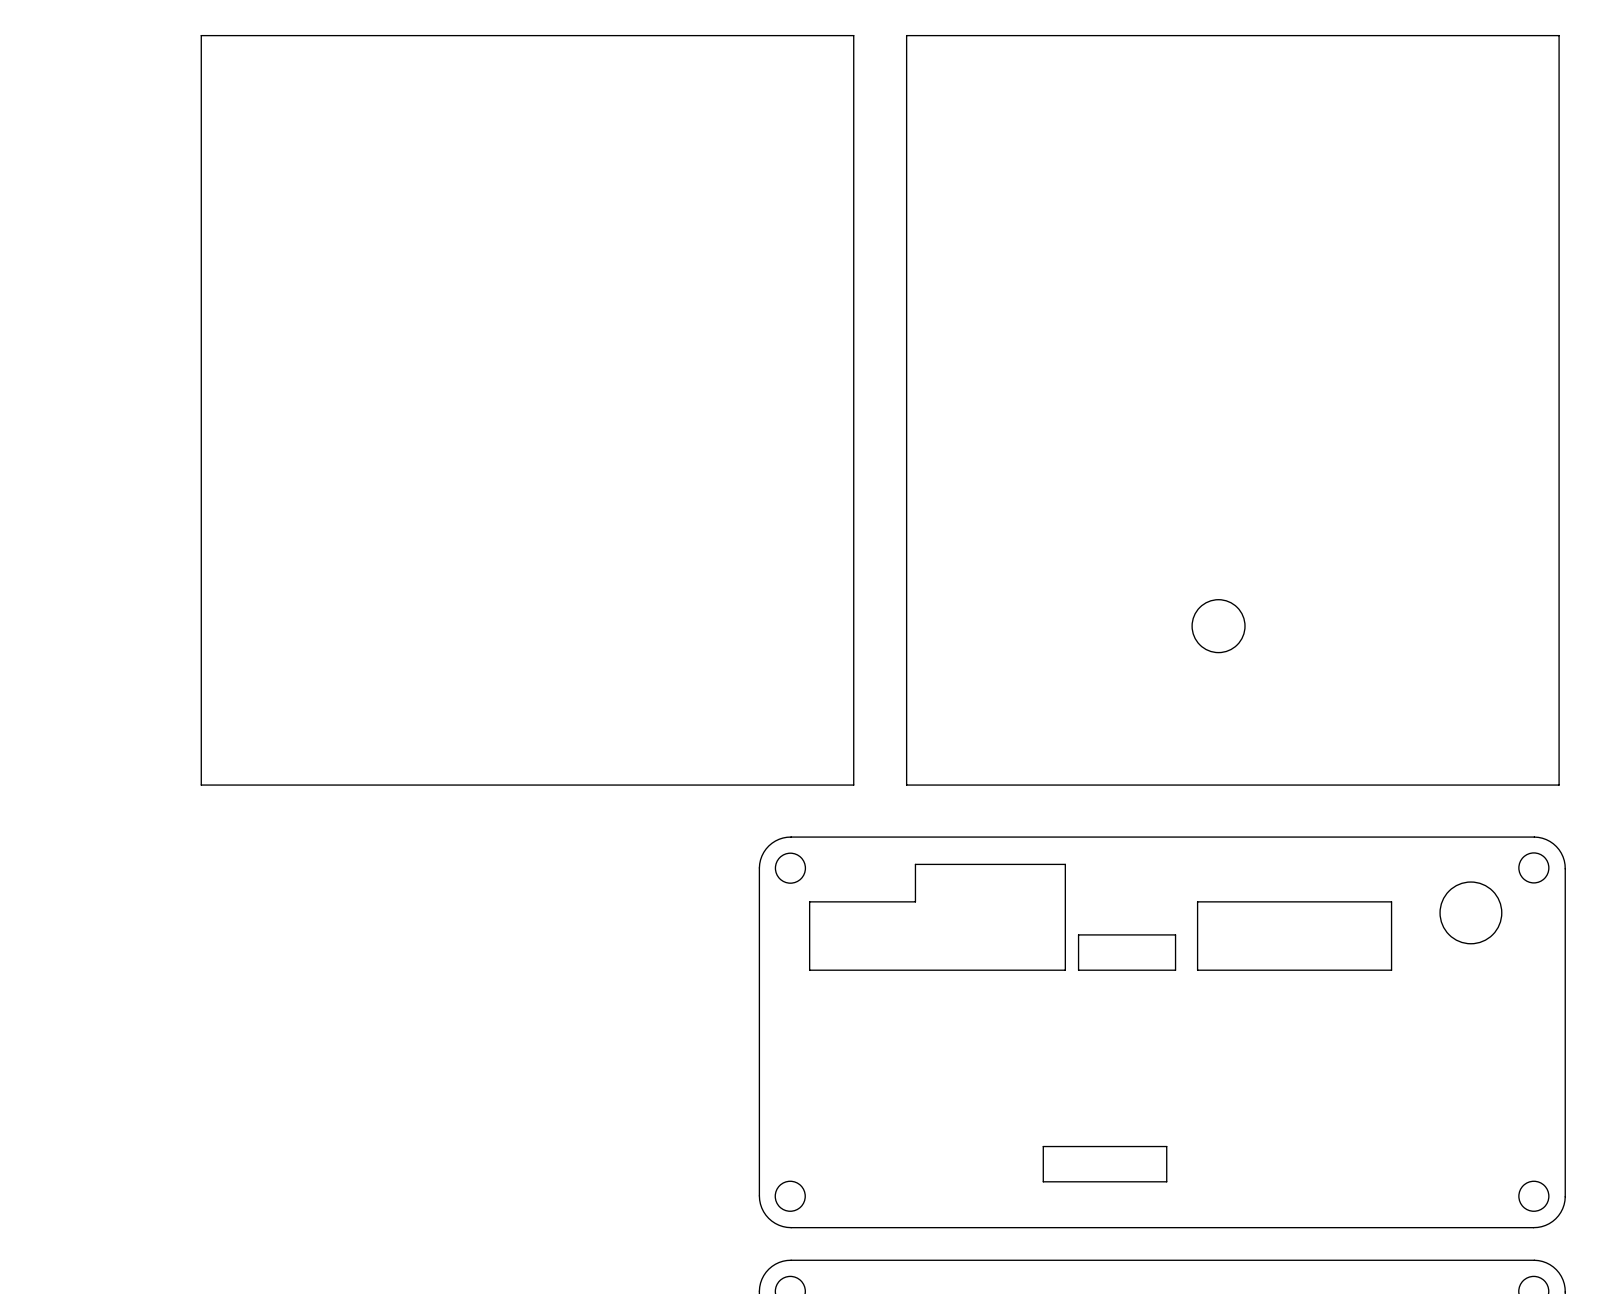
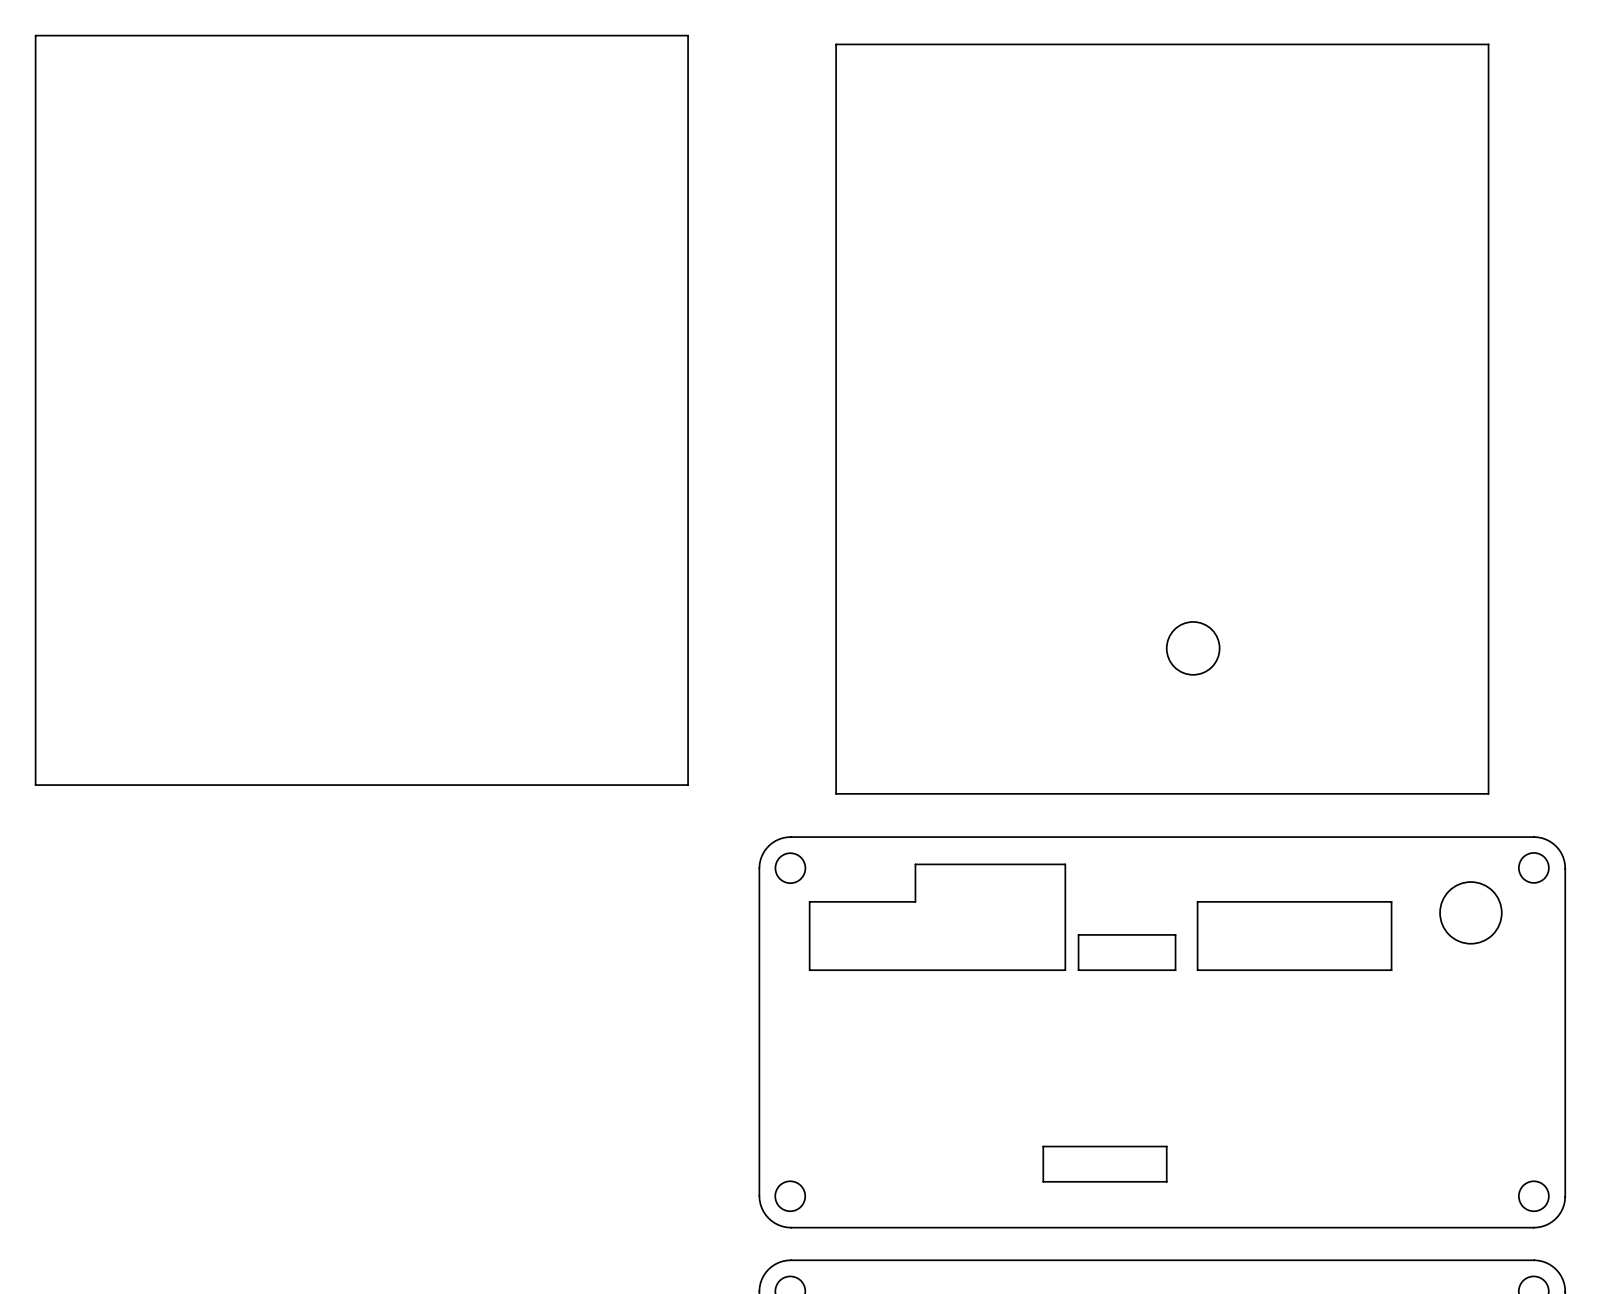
board edge: (201, 35) (201, 785) -> (201, 35) (35, 35) (35, 785) (201, 785)
board edge: (688, 35) (853, 35) (853, 785) (688, 785) -> (688, 35) (688, 785)
board edge: (1559, 35) (1559, 785) (906, 785) (906, 35) (1559, 35) -> (1488, 44) (1488, 793) (836, 793) (836, 44) (1488, 44)
round board edge position: (1218, 626) -> (1193, 648)

